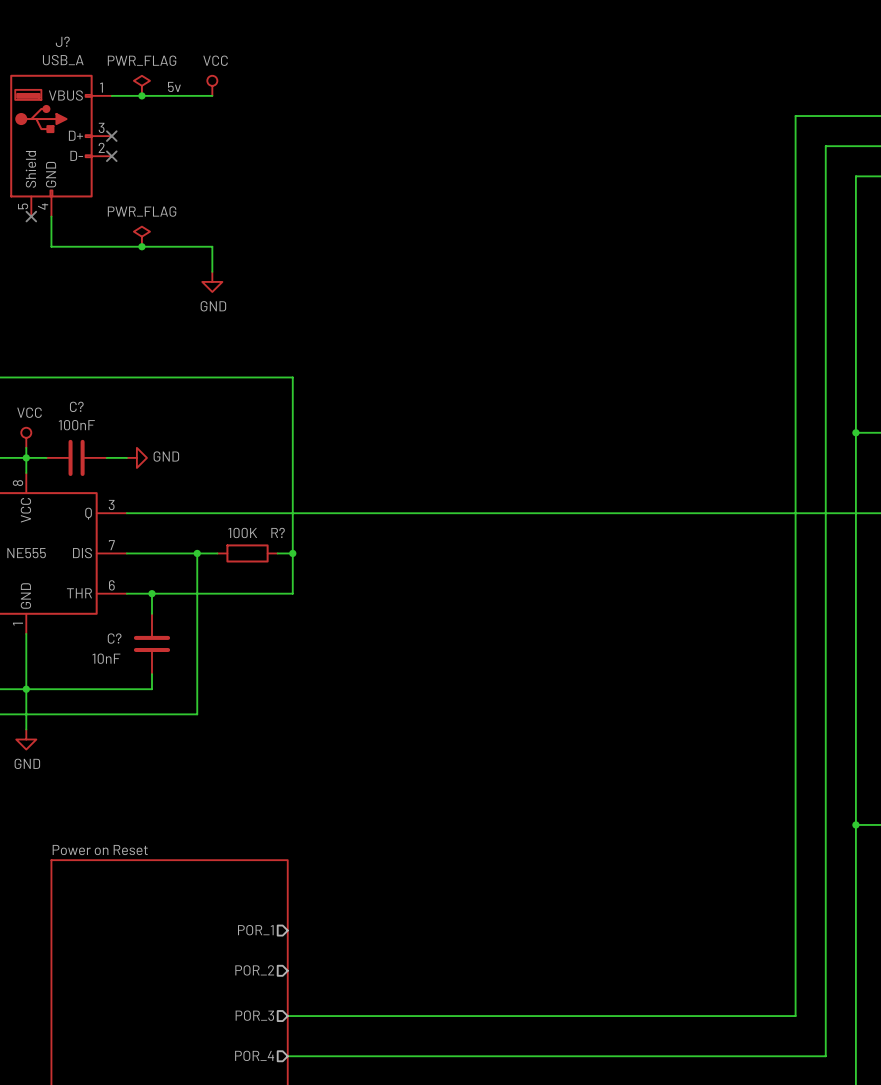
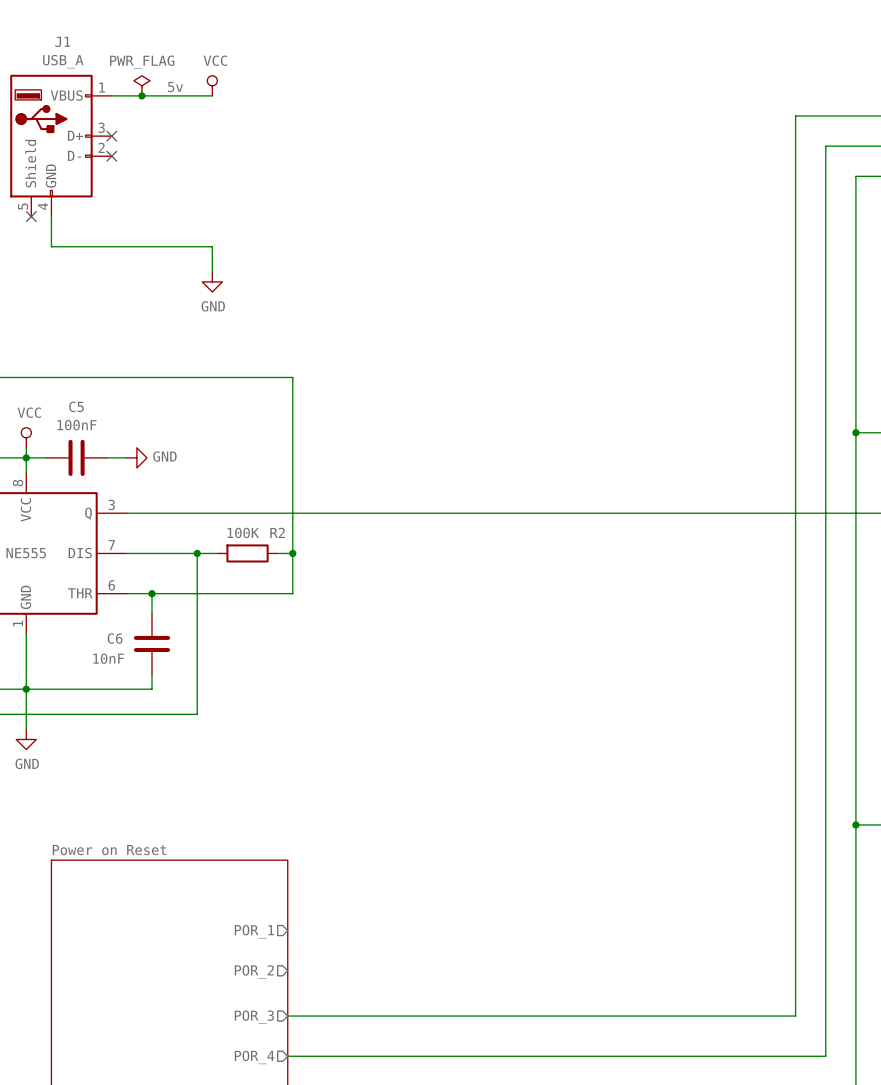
J? name: J? (62, 41) -> J1 (62, 41)
power symbol: PWR_FLAG (141, 236) -> none
junction: (141, 246) -> none
C? name: C? (76, 406) -> C5 (76, 406)
R? name: R? (278, 532) -> R2 (277, 532)
C? name: C? (114, 638) -> C6 (115, 638)

